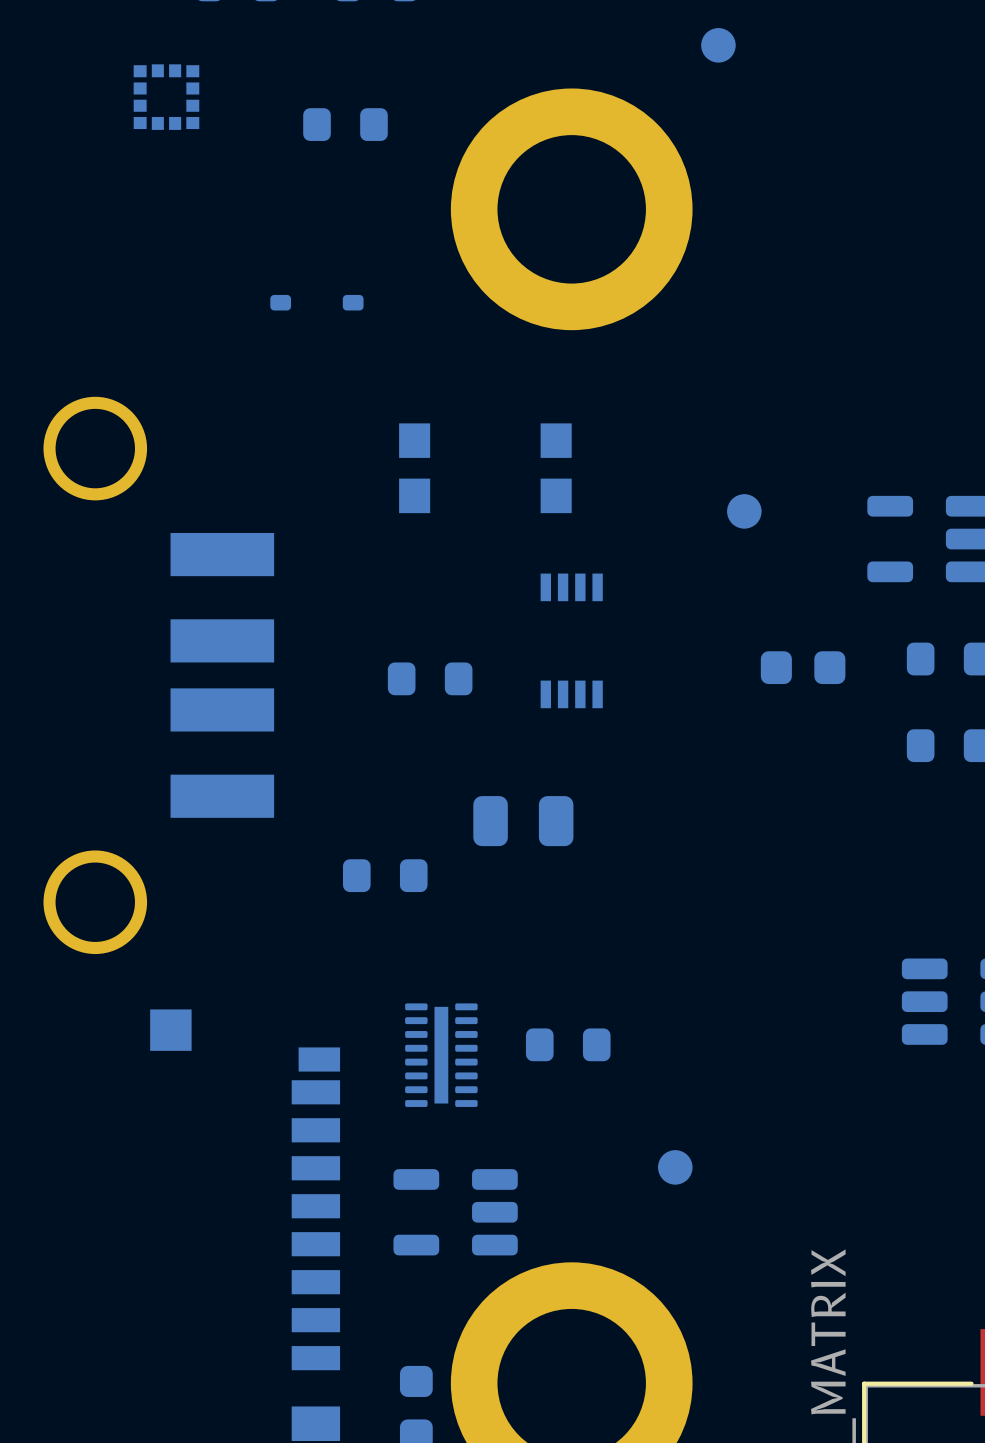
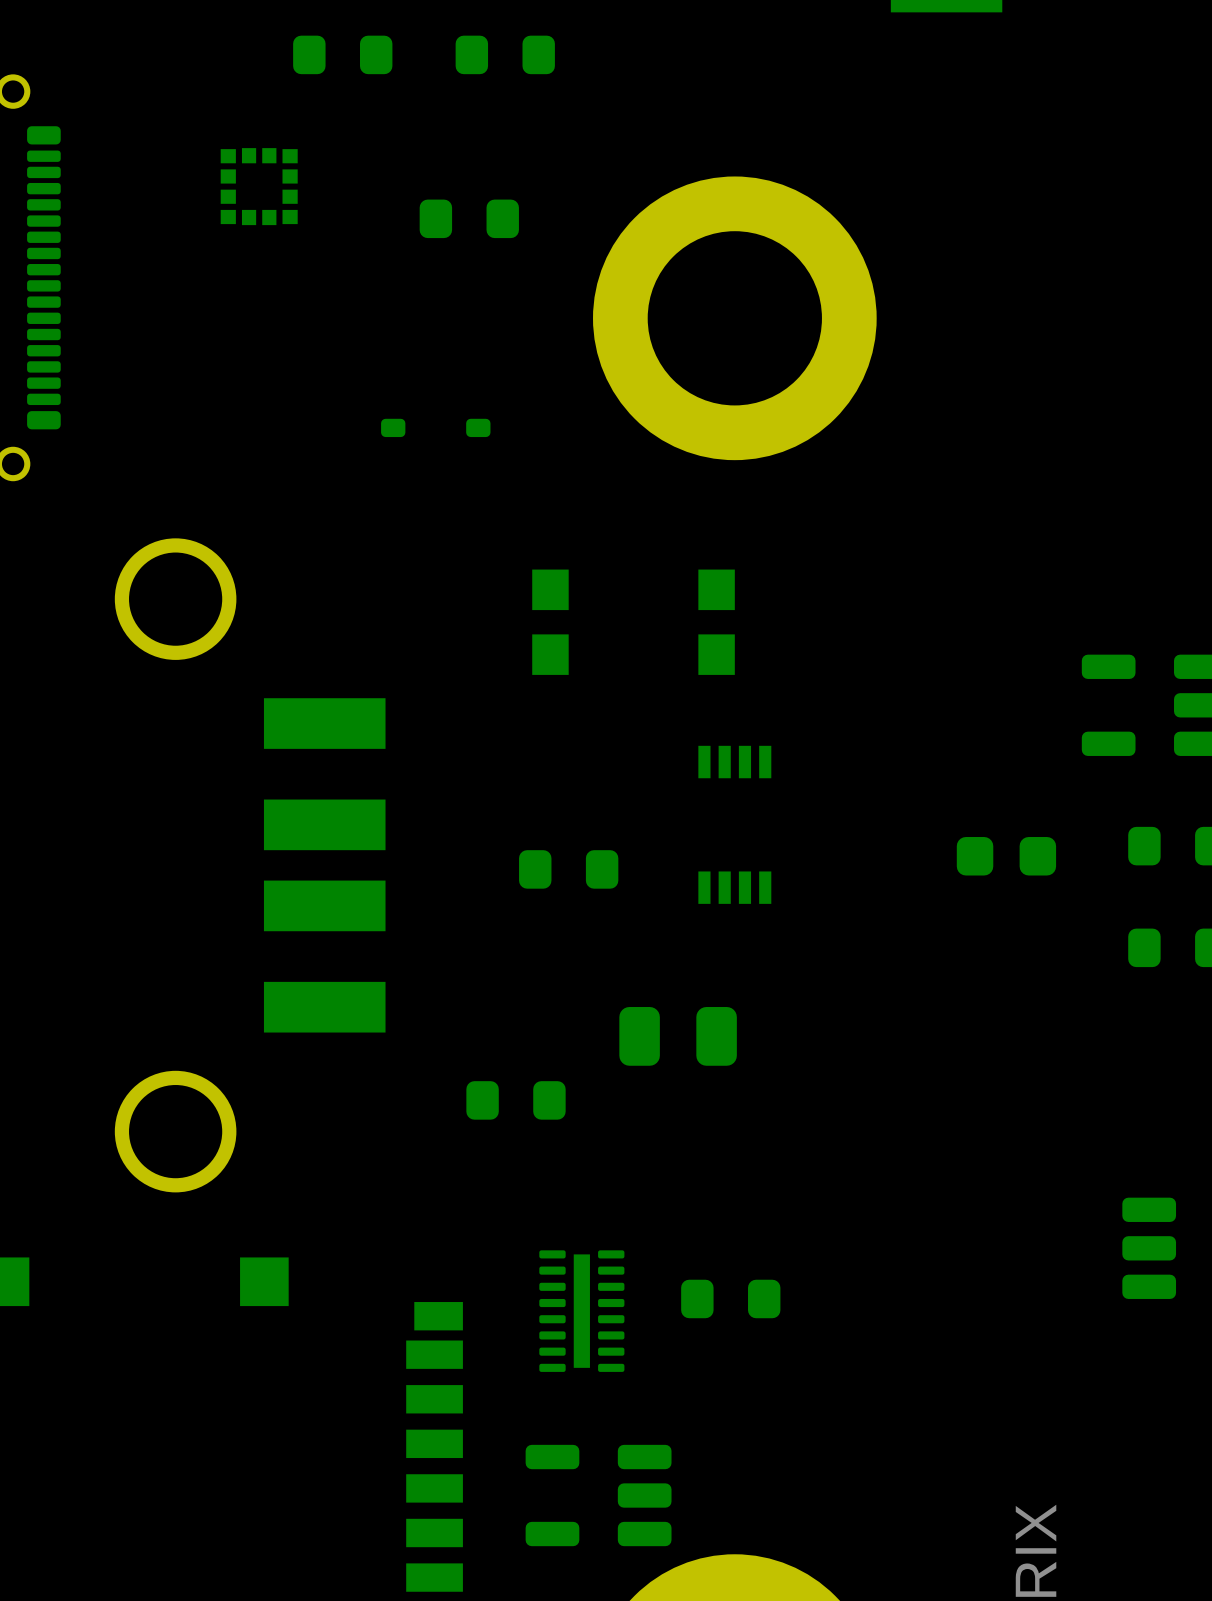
part: (718, 45) -> none
part: (744, 511) -> none
part: (675, 1167) -> none

